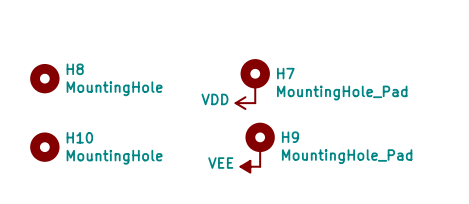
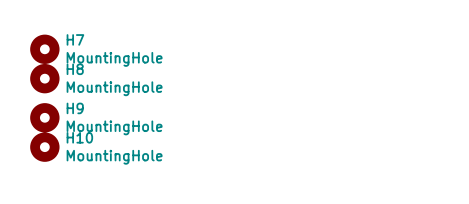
H7 symbol: [240, 59, 270, 104] -> [30, 34, 60, 64]
H7 value: MountingHole_Pad (342, 93) -> MountingHole (114, 59)
power symbol: VDD (245, 103) -> none
H9 symbol: [245, 122, 275, 167] -> [30, 103, 60, 133]
H9 value: MountingHole_Pad (347, 156) -> MountingHole (114, 127)
power symbol: VEE (250, 166) -> none

